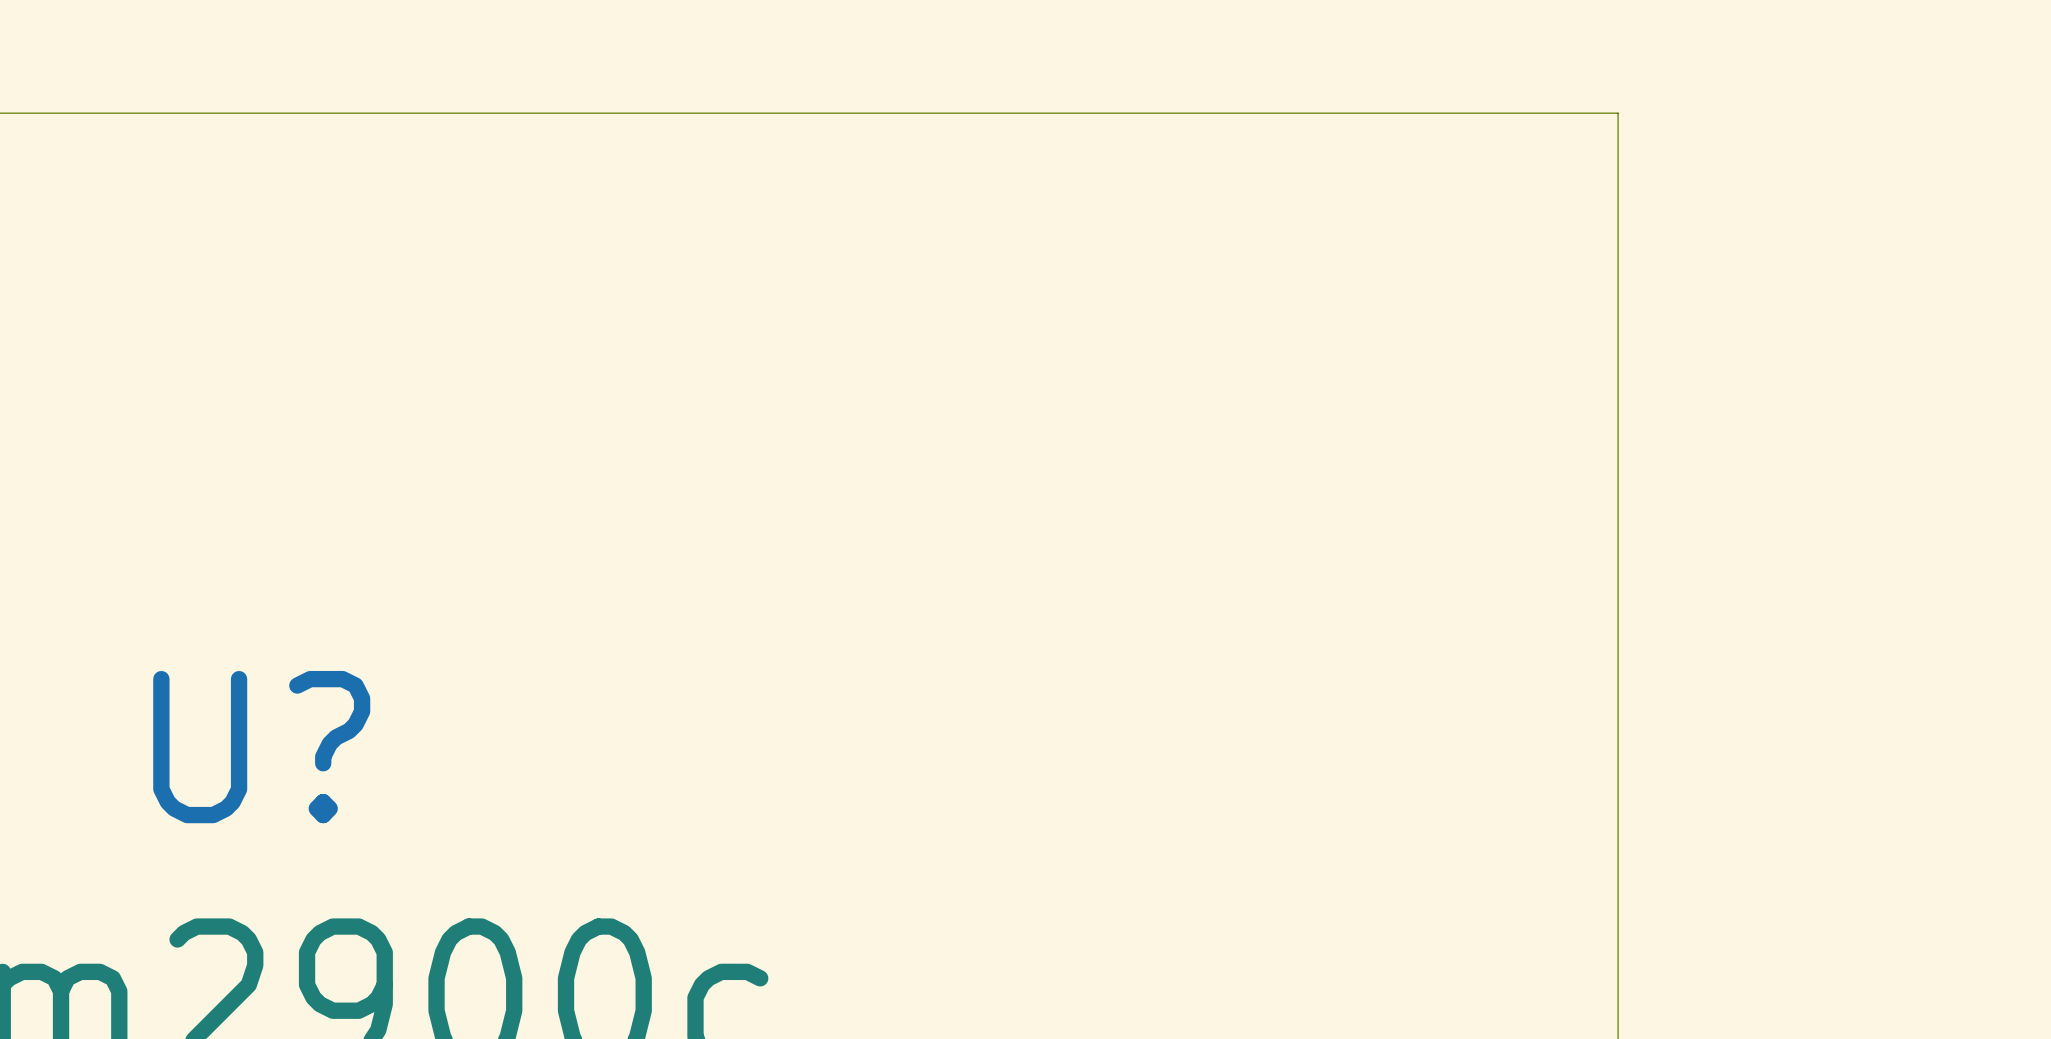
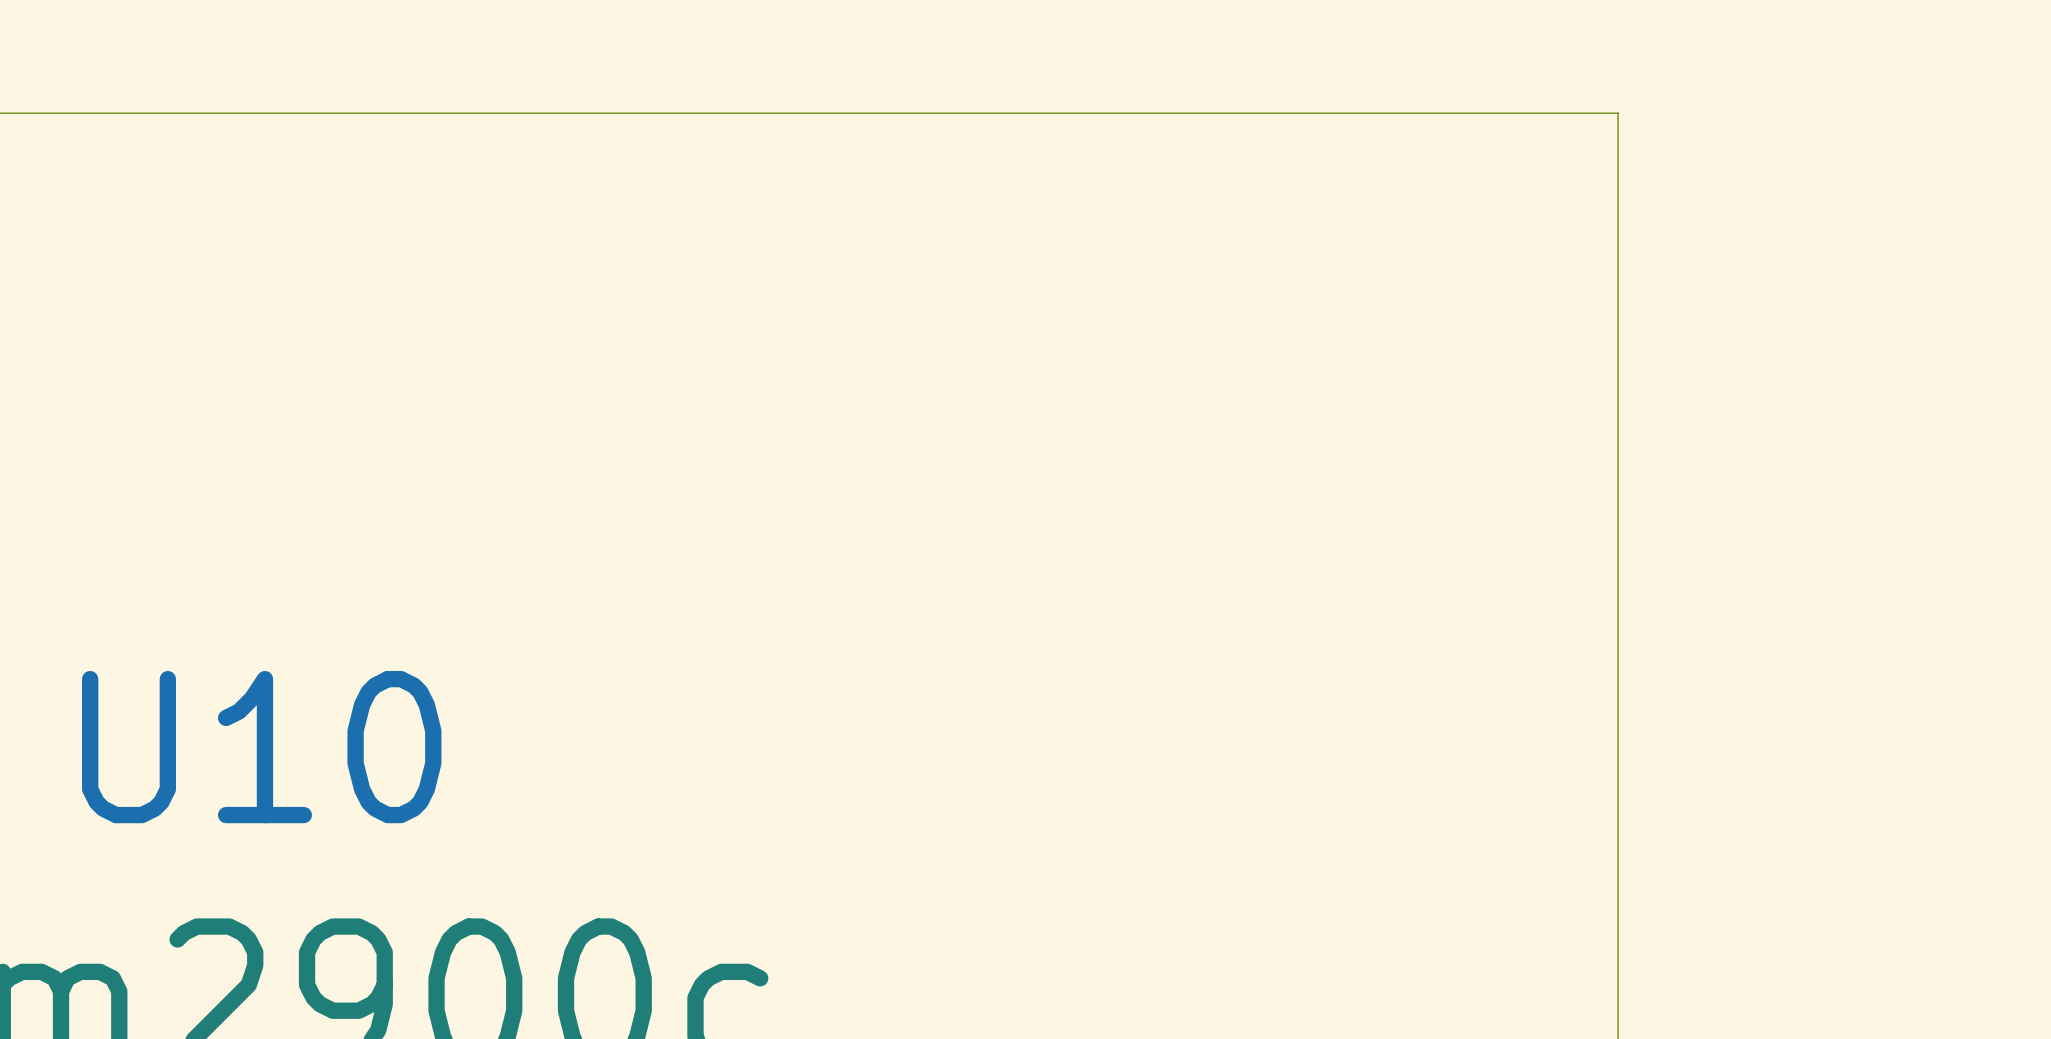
U? name: U? (261, 747) -> U10 (261, 747)

